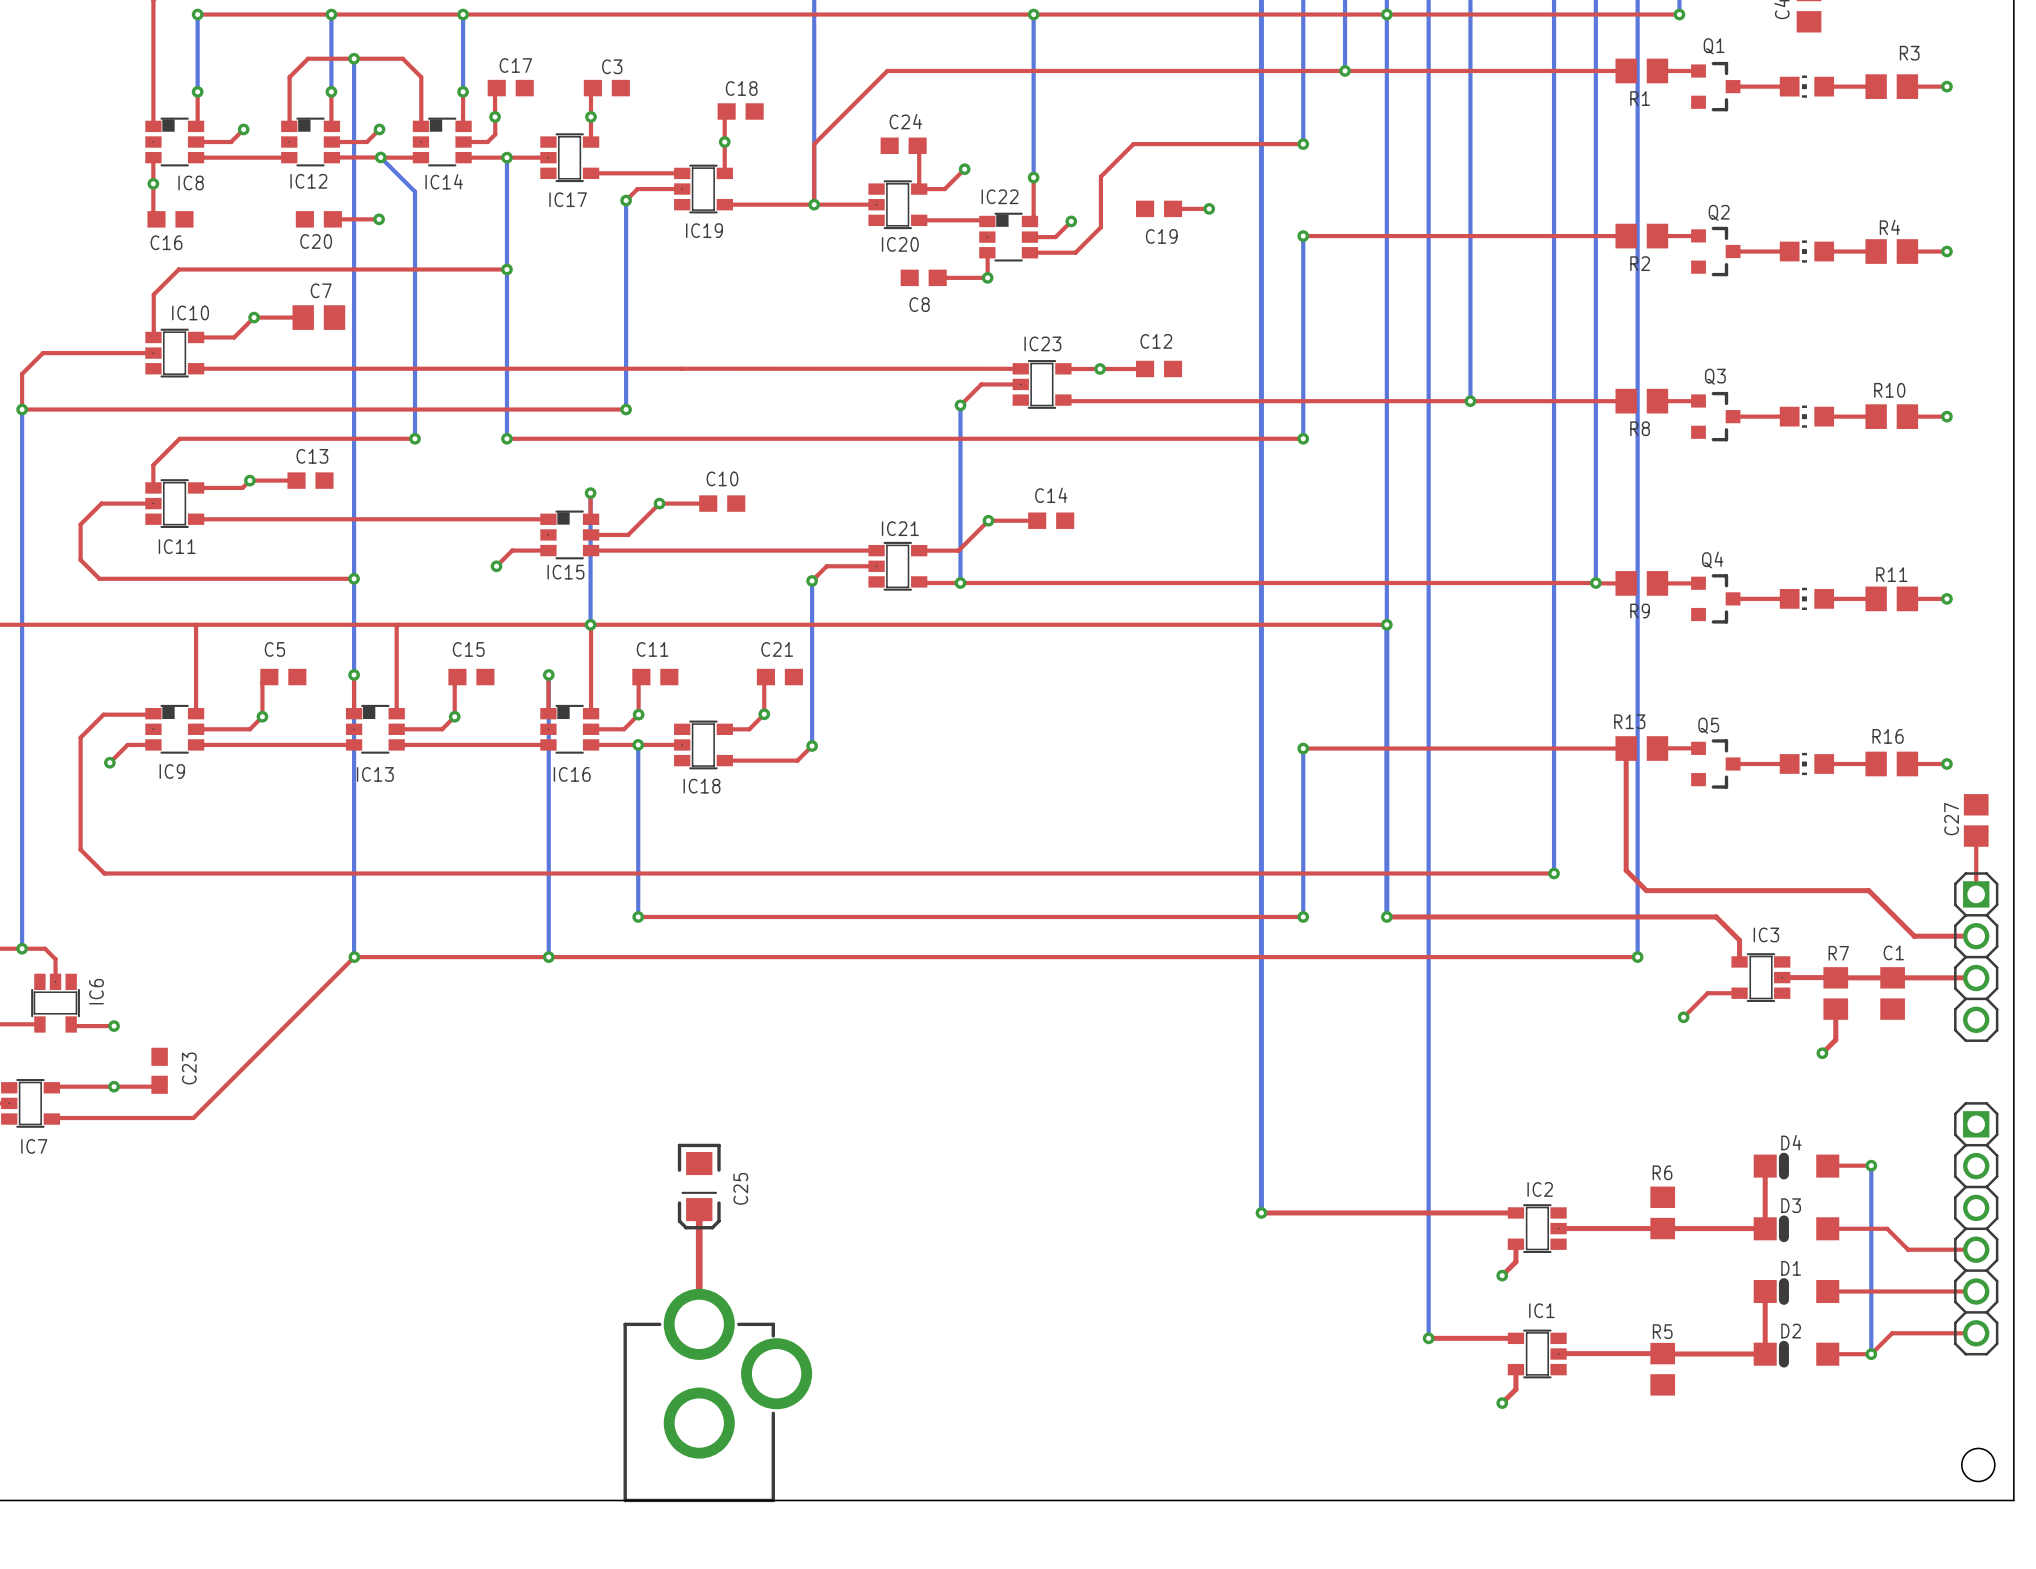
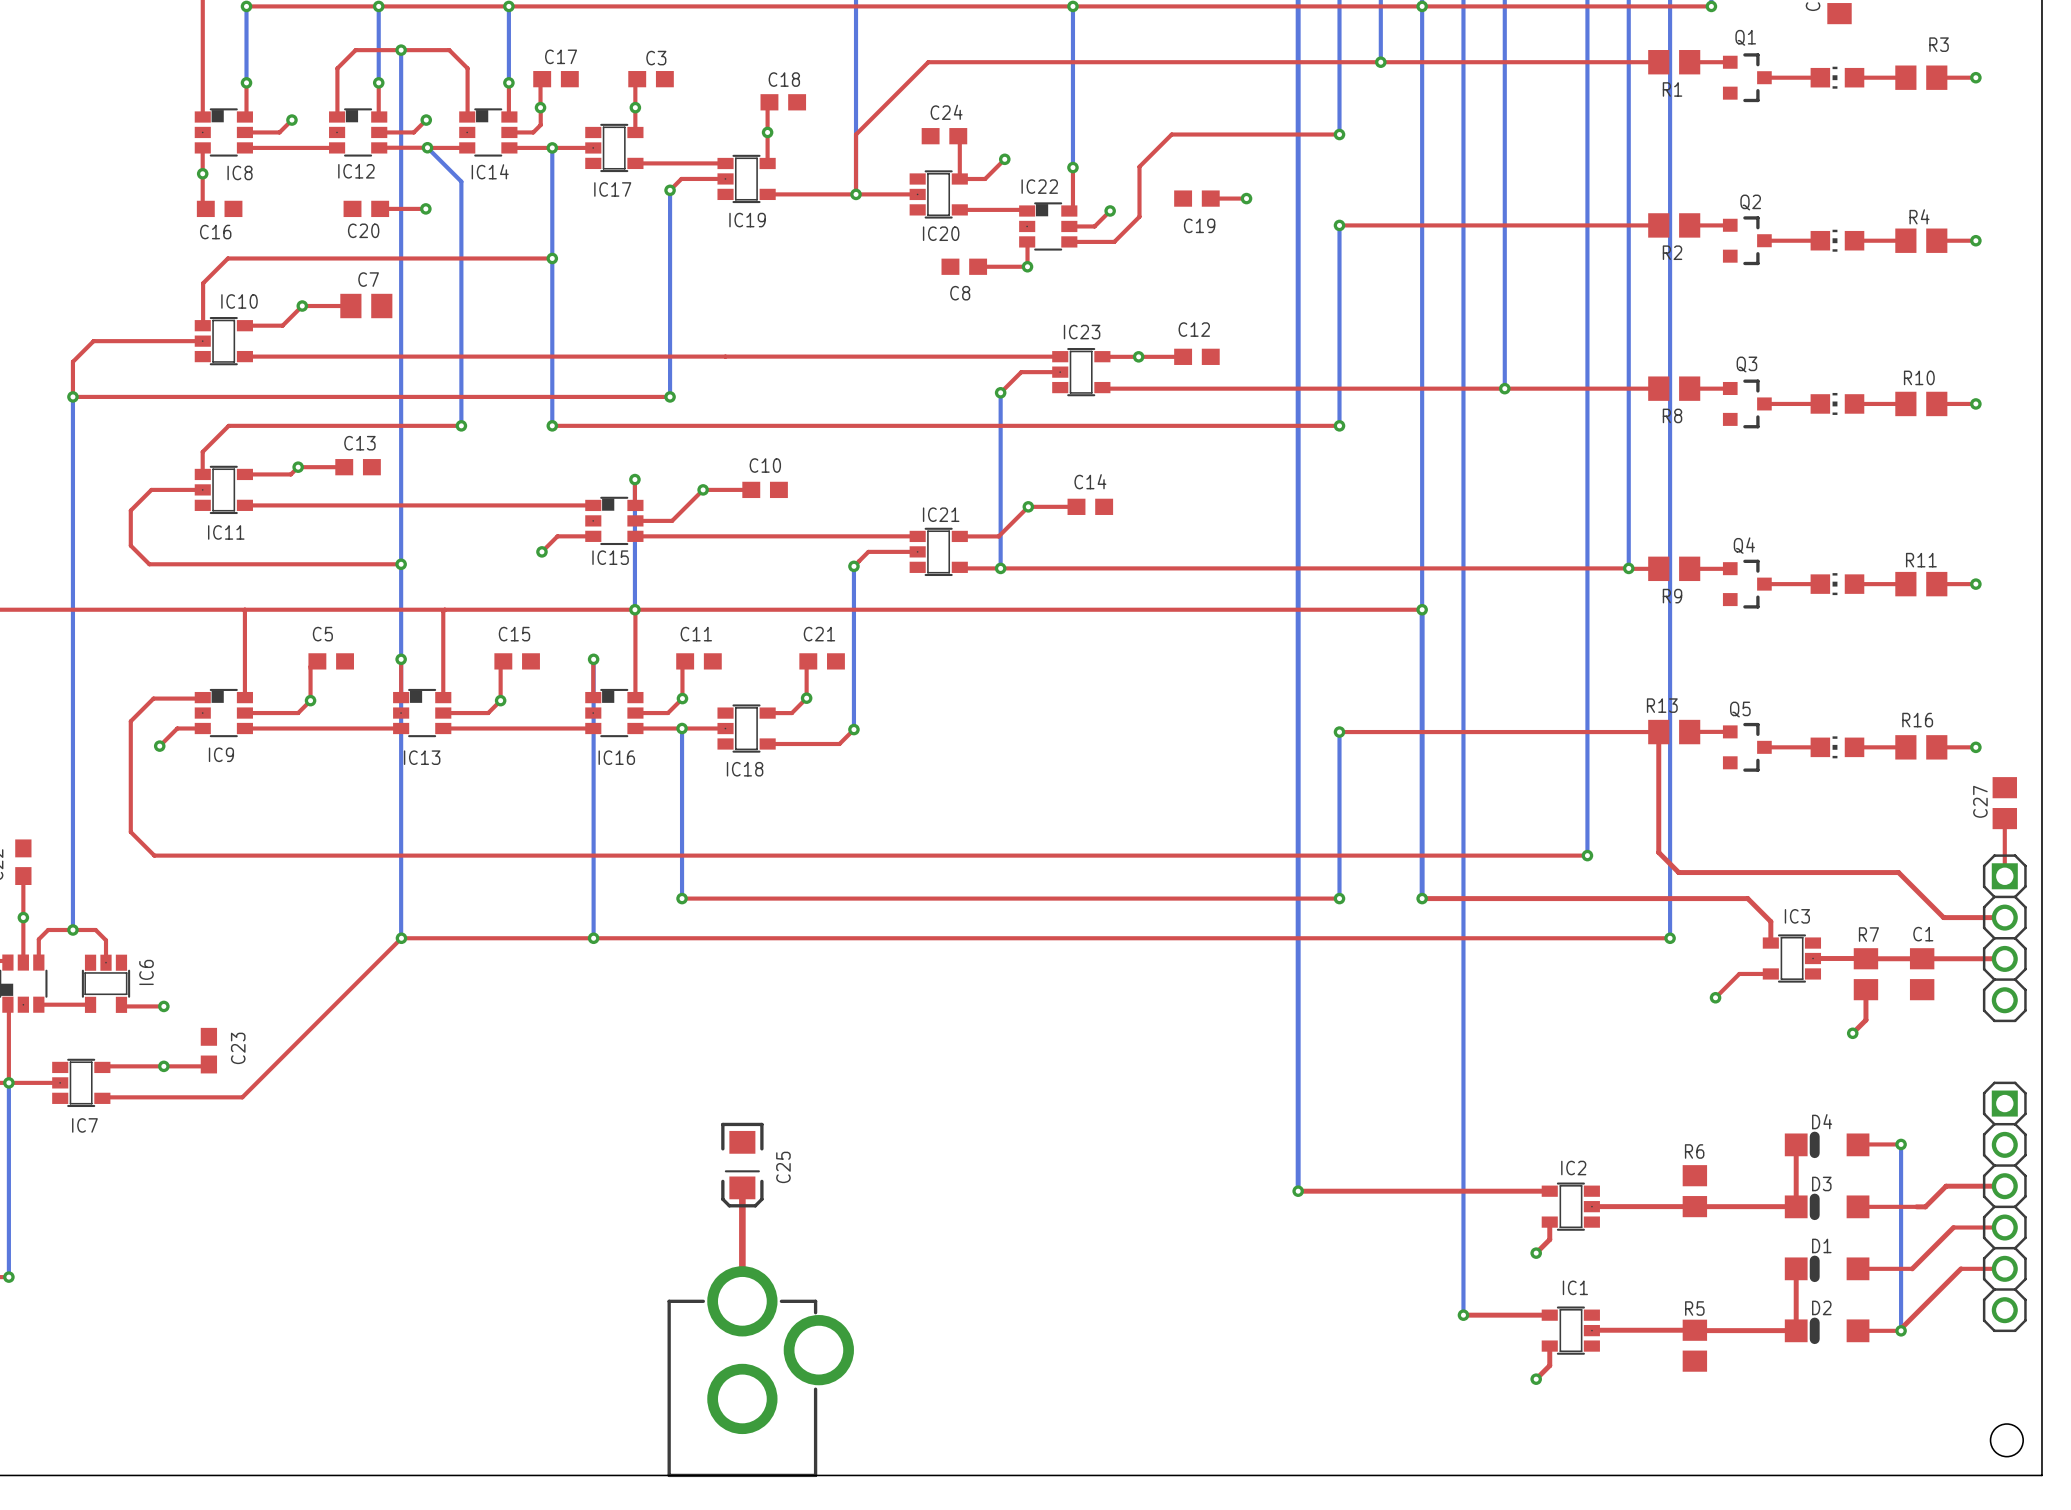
top track: (1887, 1228) (1908, 1249) (1924, 1249) -> (1916, 1206) (1925, 1206) (1946, 1186) (2004, 1186)
top track: (1882, 1291) (1931, 1291) -> (1912, 1268) (1953, 1227)
top track: (1976, 1333) (1892, 1333) (1869, 1354) -> (1960, 1268) (1899, 1330)

